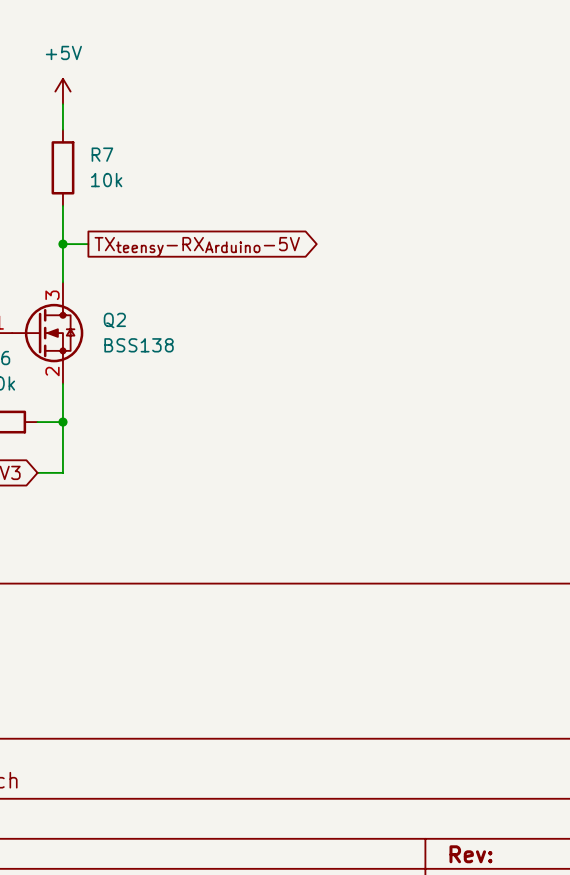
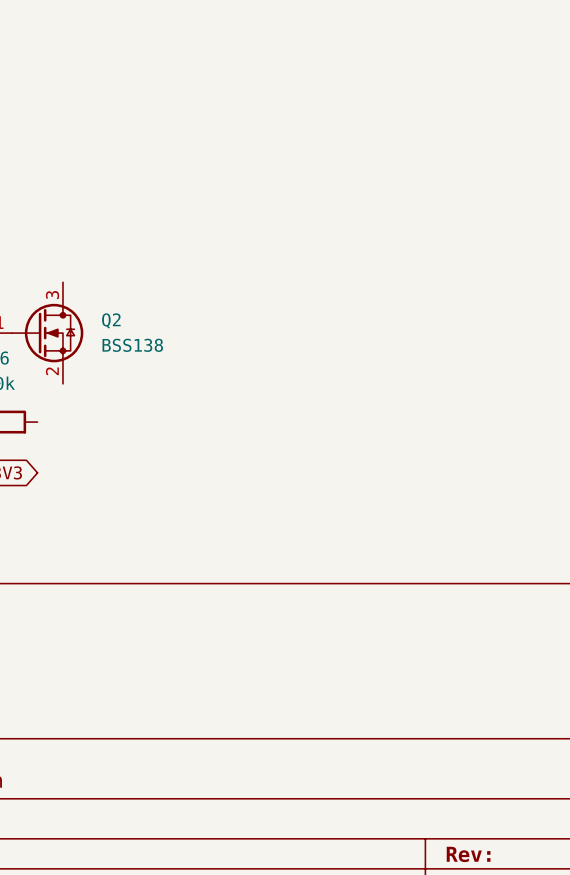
power symbol: +5V (62, 91) -> none
wire: (62, 104) (62, 129) -> none
R7: 10k (62, 167) -> none
wire: (62, 205) (62, 282) -> none
wire: (62, 244) (88, 244) -> none
junction: (62, 244) -> none
global label: TXteensy-RXArduino-5V (197, 246) -> none
wire: (62, 383) (62, 472) (37, 472) -> none
wire: (37, 422) (62, 422) -> none
junction: (62, 422) -> none

